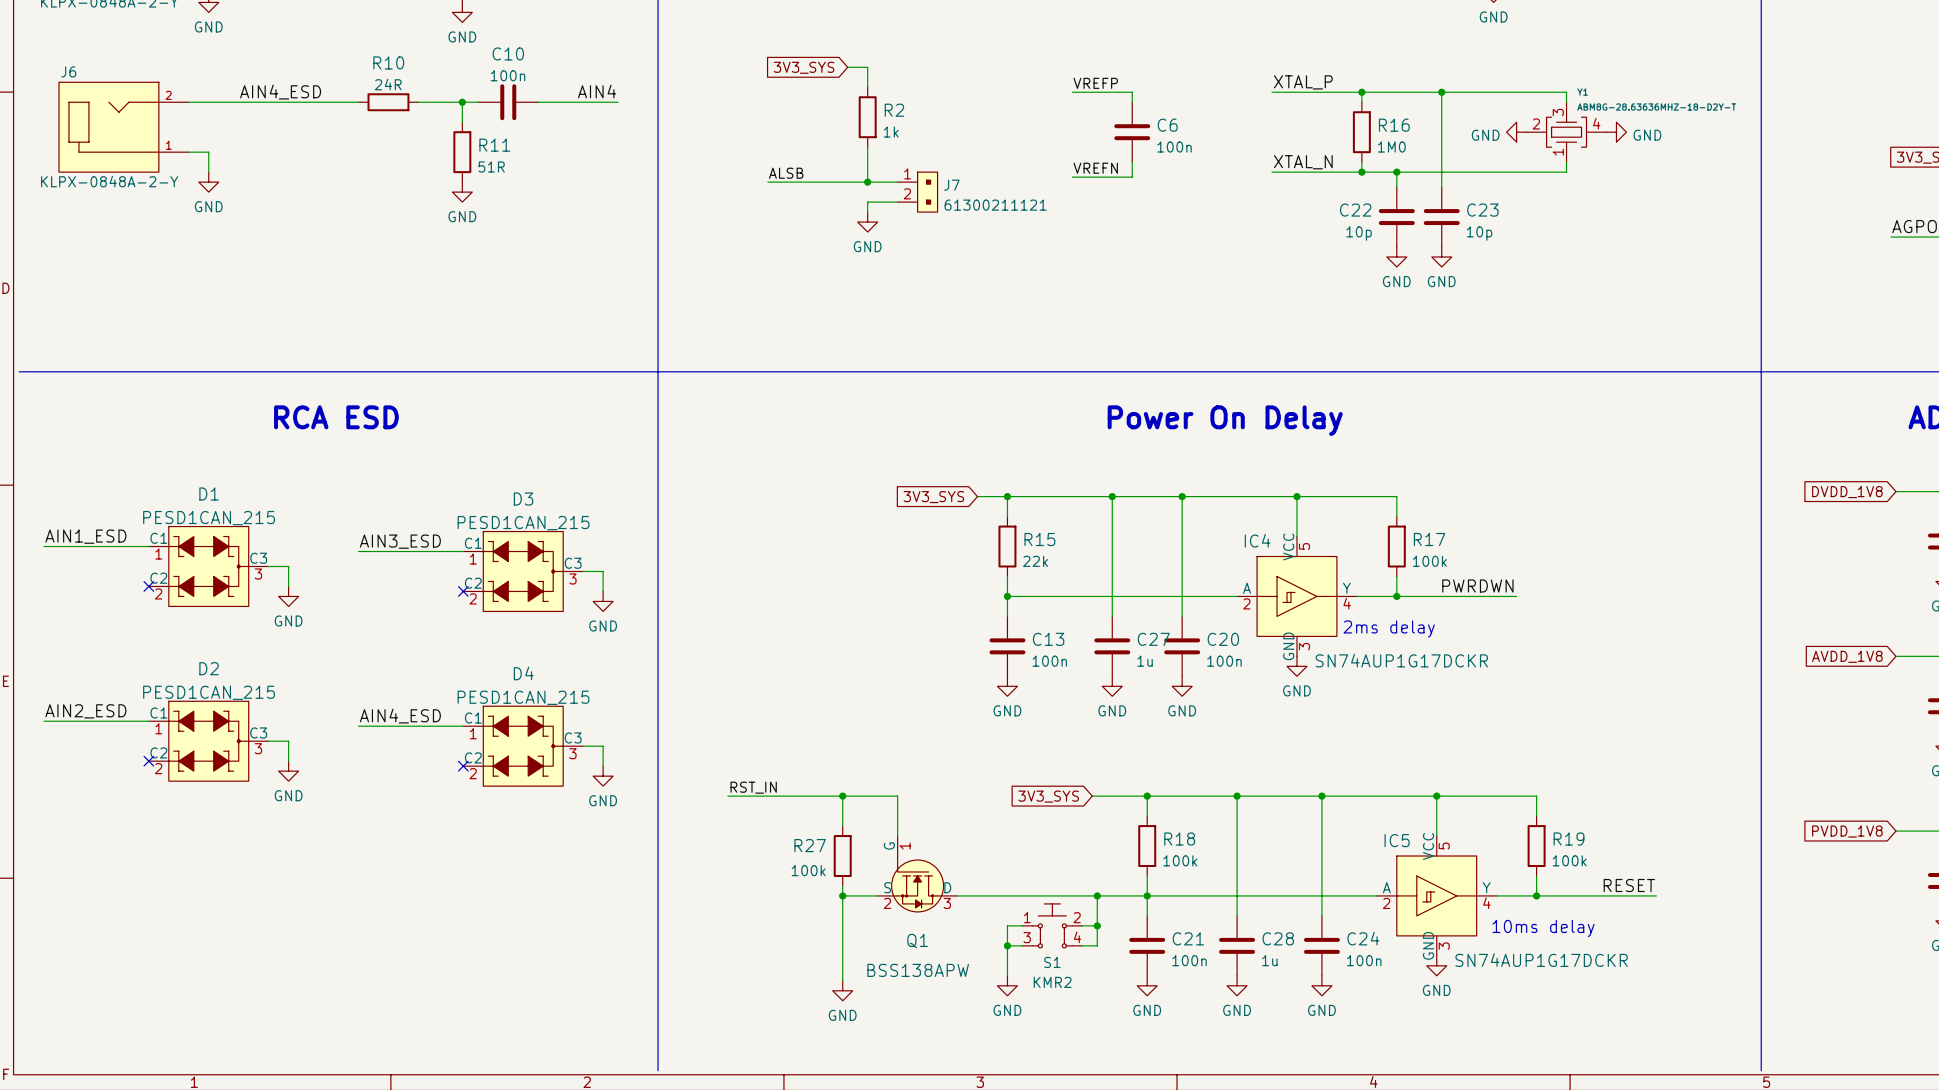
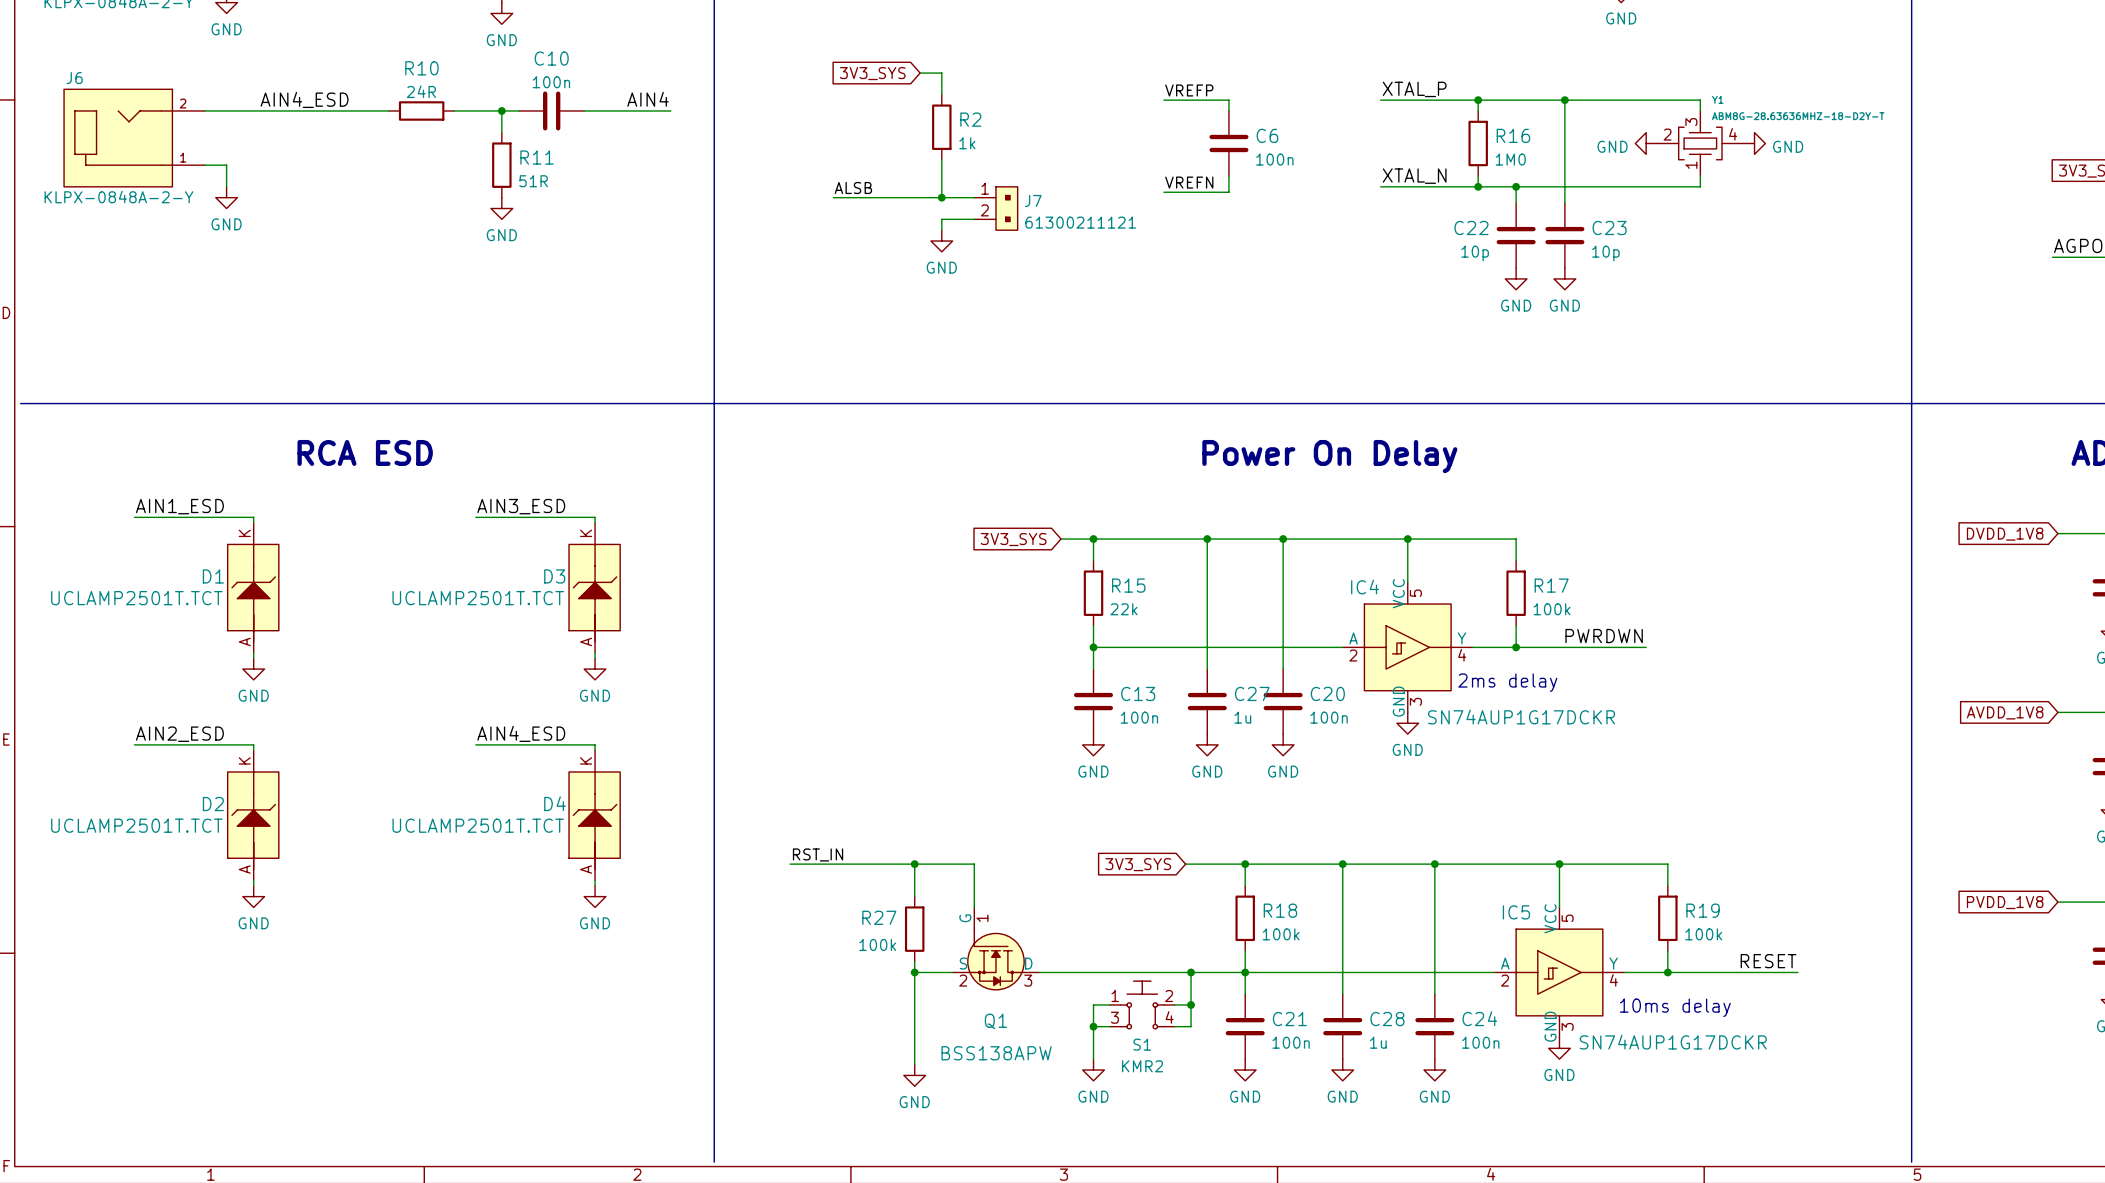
wire: none -> (134, 517) (253, 517) (253, 522)
wire: none -> (475, 517) (595, 517) (595, 522)
D1 name position: D1 (209, 494) -> D1 (213, 576)
D3 name position: D3 (523, 498) -> D3 (554, 576)
D1 value: PESD1CAN_215 (209, 518) -> UCLAMP2501T.TCT (136, 598)
D3 value: PESD1CAN_215 (523, 523) -> UCLAMP2501T.TCT (478, 598)
D1 symbol: [148, 526, 269, 607] -> [227, 522, 279, 653]
D3 symbol: [463, 531, 584, 612] -> [569, 522, 621, 653]
label position: AIN1_ESD (85, 536) -> AIN1_ESD (179, 506)
label position: AIN3_ESD (400, 541) -> AIN3_ESD (521, 506)
wire: (44, 546) (148, 546) -> none
wire: (358, 551) (463, 551) -> none
wire: (268, 566) (288, 566) (288, 586) -> none
wire: (583, 571) (603, 571) (603, 591) -> none
no-connect mark: (148, 586) -> none
no-connect mark: (463, 591) -> none
power symbol position: GND (288, 596) -> GND (253, 669)
power symbol position: GND (603, 601) -> GND (595, 669)
D2 name position: D2 (209, 668) -> D2 (213, 804)
D4 name position: D4 (523, 673) -> D4 (555, 803)
wire: none -> (134, 744) (253, 744) (253, 750)
wire: none -> (475, 744) (595, 744) (595, 750)
D2 value: PESD1CAN_215 (209, 692) -> UCLAMP2501T.TCT (136, 825)
D4 value: PESD1CAN_215 (523, 697) -> UCLAMP2501T.TCT (478, 825)
D2 symbol: [148, 701, 269, 782] -> [227, 750, 279, 881]
D4 symbol: [463, 706, 584, 787] -> [569, 750, 621, 881]
label position: AIN2_ESD (85, 711) -> AIN2_ESD (179, 734)
label position: AIN4_ESD (400, 716) -> AIN4_ESD (521, 733)
wire: (44, 721) (148, 721) -> none
wire: (358, 726) (463, 726) -> none
wire: (268, 741) (288, 741) (288, 761) -> none
wire: (583, 746) (603, 746) (603, 766) -> none
no-connect mark: (148, 761) -> none
no-connect mark: (463, 766) -> none
power symbol position: GND (288, 771) -> GND (253, 896)
power symbol position: GND (603, 776) -> GND (595, 896)
wire: none -> (253, 880) (253, 885)
wire: none -> (595, 880) (595, 885)

